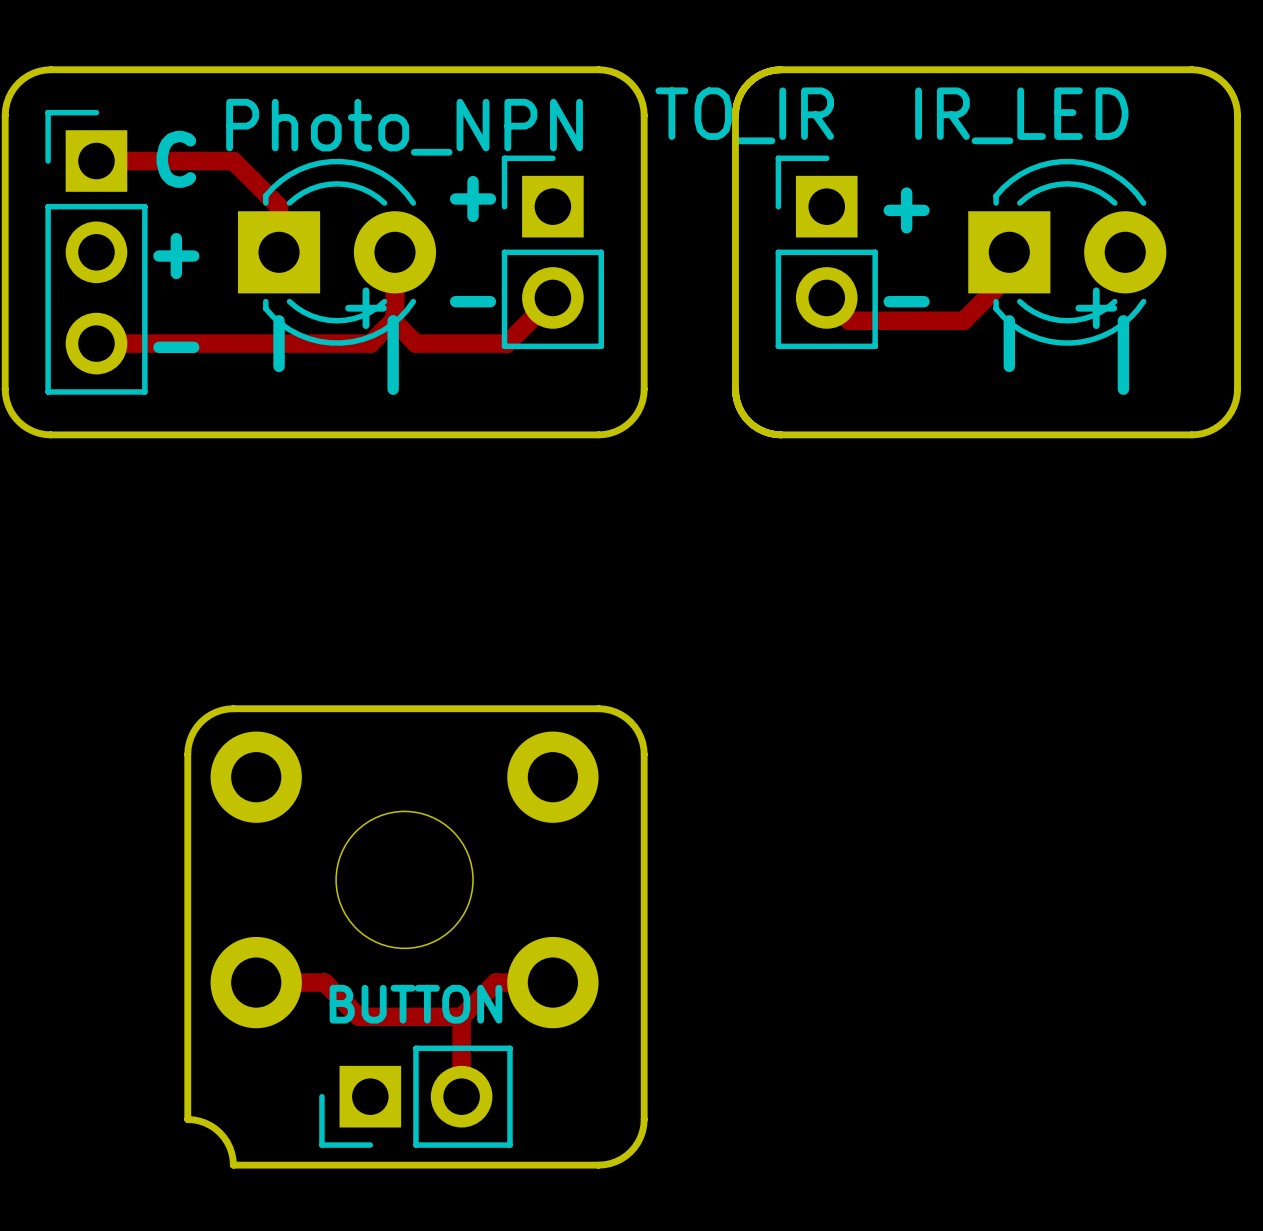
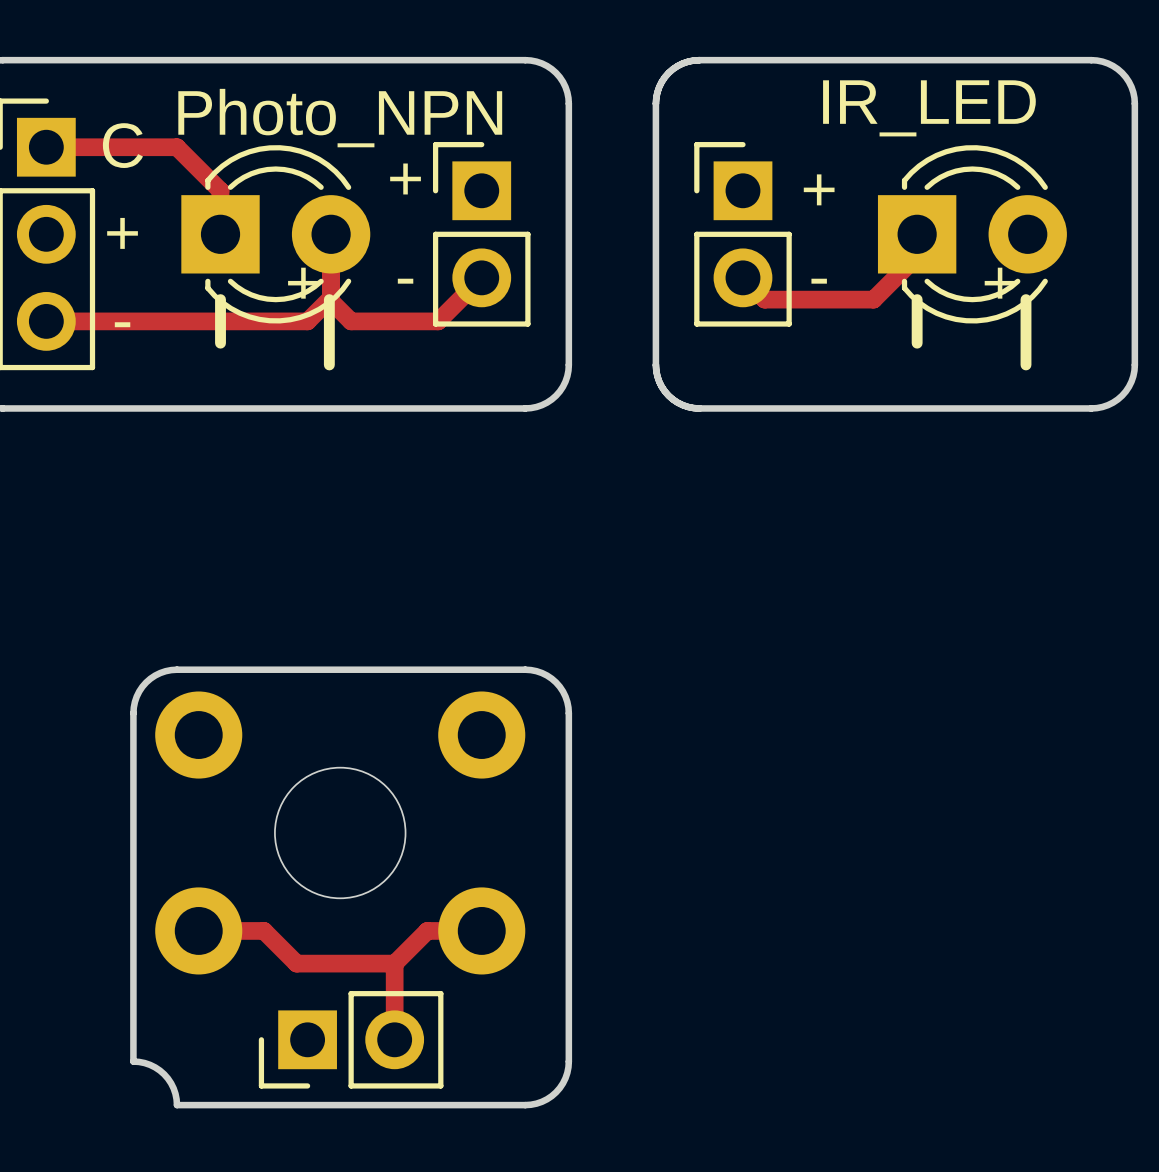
part value: TO_IR (744, 115) -> none
part value: BUTTON (415, 1004) -> none

